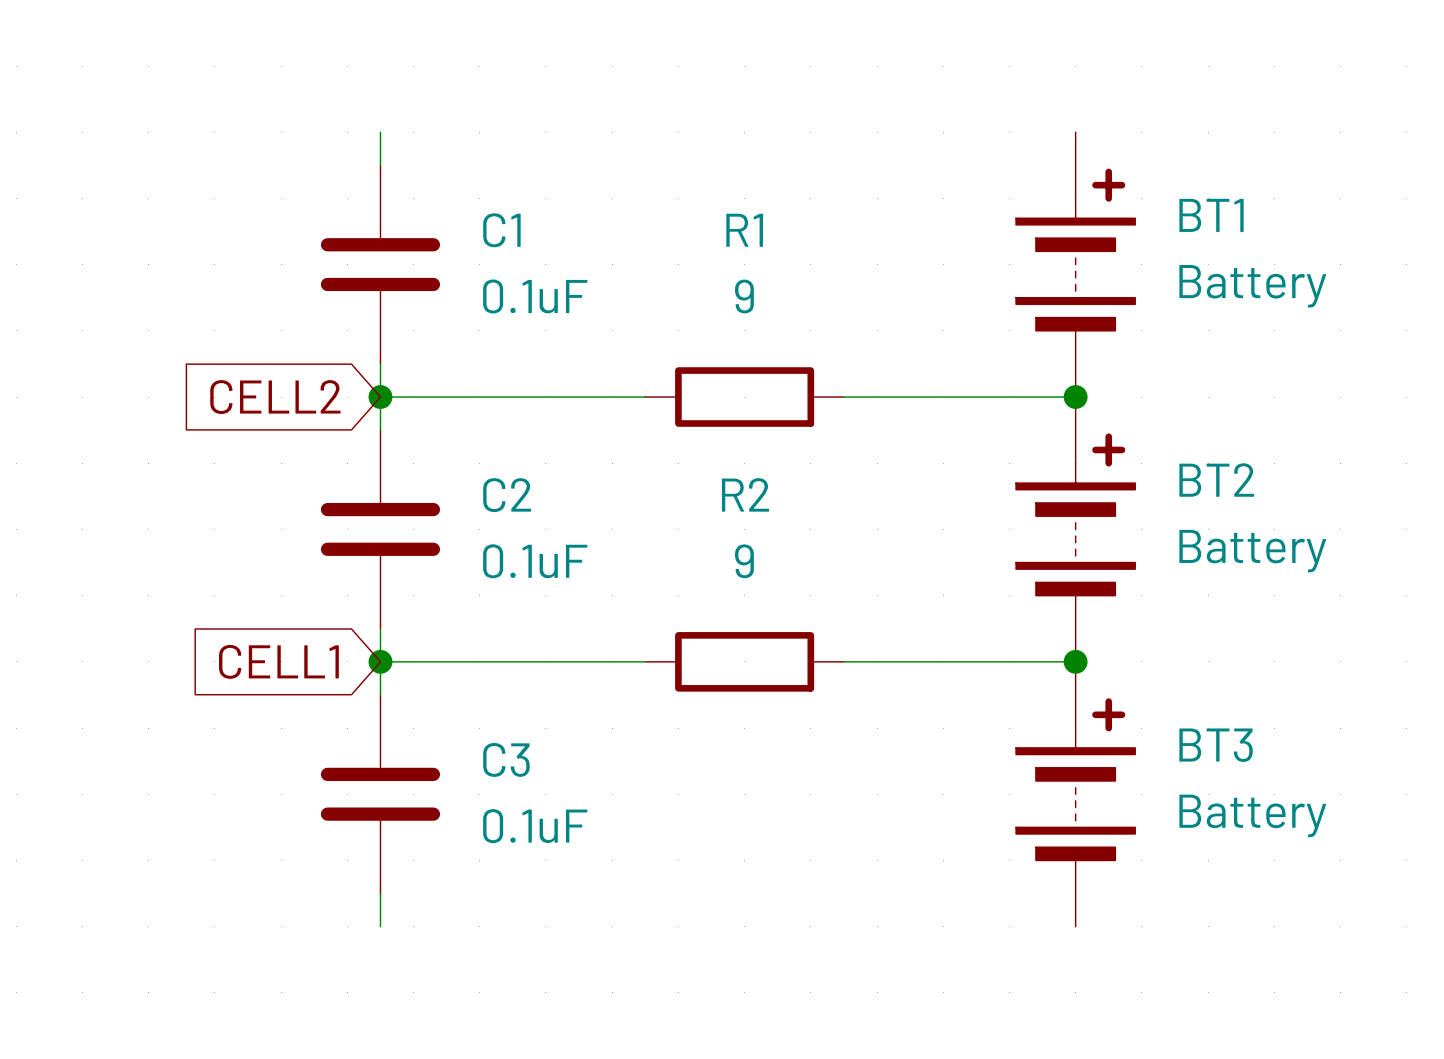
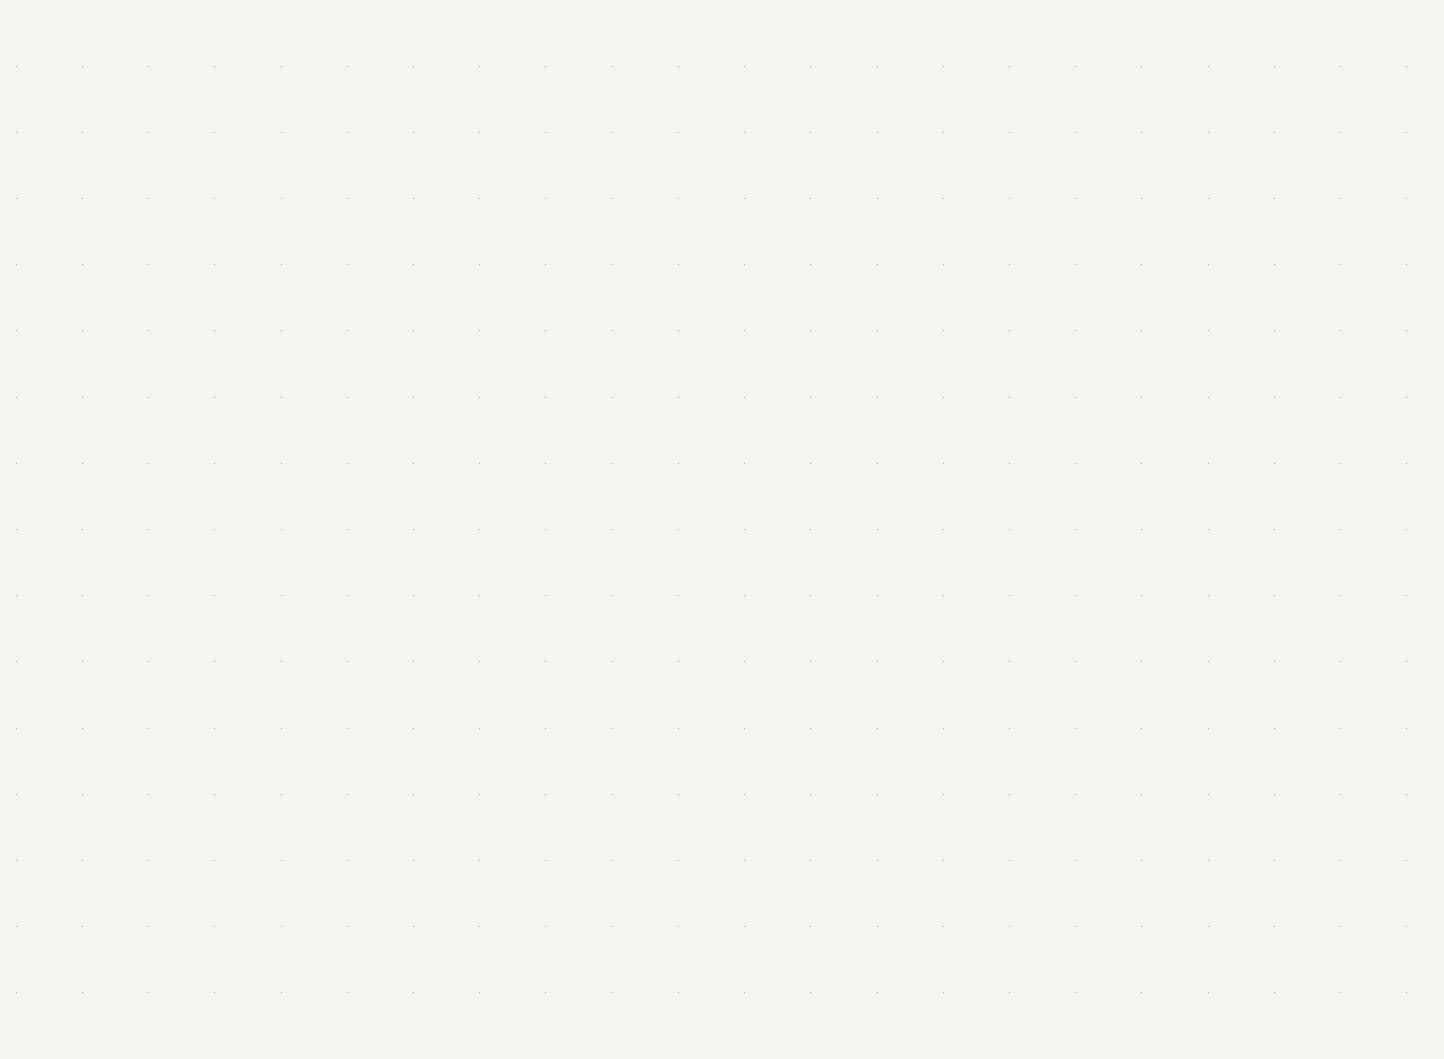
wire: (380, 132) (380, 165) -> none
C1: 0.1uF (380, 264) -> none
BT1: Battery (1075, 264) -> none
wire: (380, 363) (380, 430) -> none
global label: CELL2 (275, 397) -> none
wire: (380, 397) (645, 397) -> none
junction: (380, 397) -> none
R1: 9 (744, 397) -> none
wire: (843, 397) (1075, 397) -> none
junction: (1075, 397) -> none
C2: 0.1uF (380, 529) -> none
BT2: Battery (1075, 529) -> none
wire: (380, 628) (380, 694) -> none
global label: CELL1 (278, 661) -> none
wire: (380, 661) (645, 661) -> none
junction: (380, 661) -> none
R2: 9 (744, 661) -> none
wire: (843, 661) (1075, 661) -> none
junction: (1075, 661) -> none
C3: 0.1uF (380, 794) -> none
BT3: Battery (1075, 794) -> none
wire: (380, 893) (380, 926) -> none

